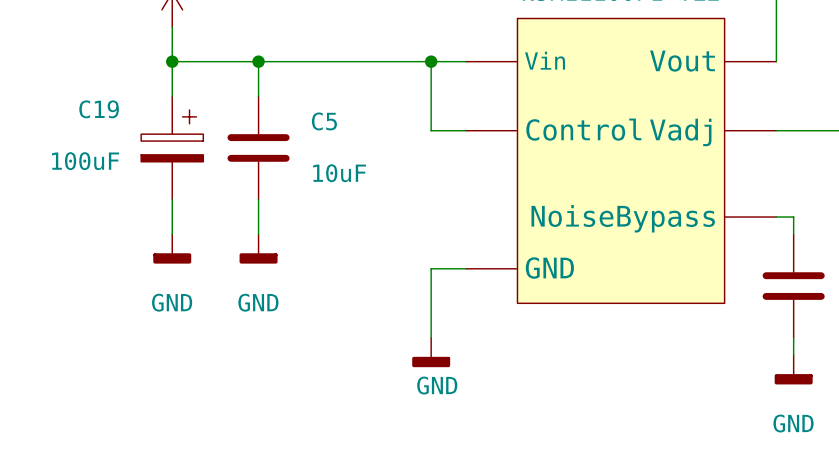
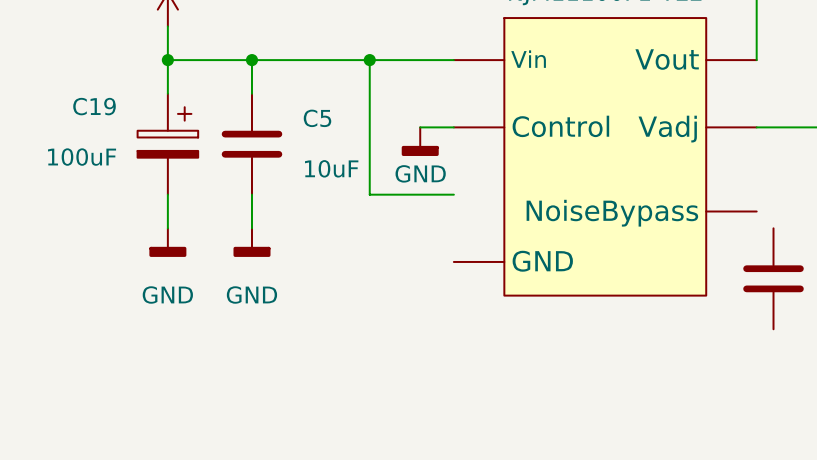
wire: none -> (369, 60) (369, 194) (453, 194)
wire: (431, 61) (431, 130) -> none
junction position: (431, 61) -> (369, 60)
wire: (776, 217) (793, 217) (793, 234) -> none
wire: (465, 268) (431, 268) (431, 337) -> none
wire: (793, 337) (793, 355) -> none
power symbol position: GND (431, 352) -> GND (420, 141)
power symbol: GND (793, 369) -> none

